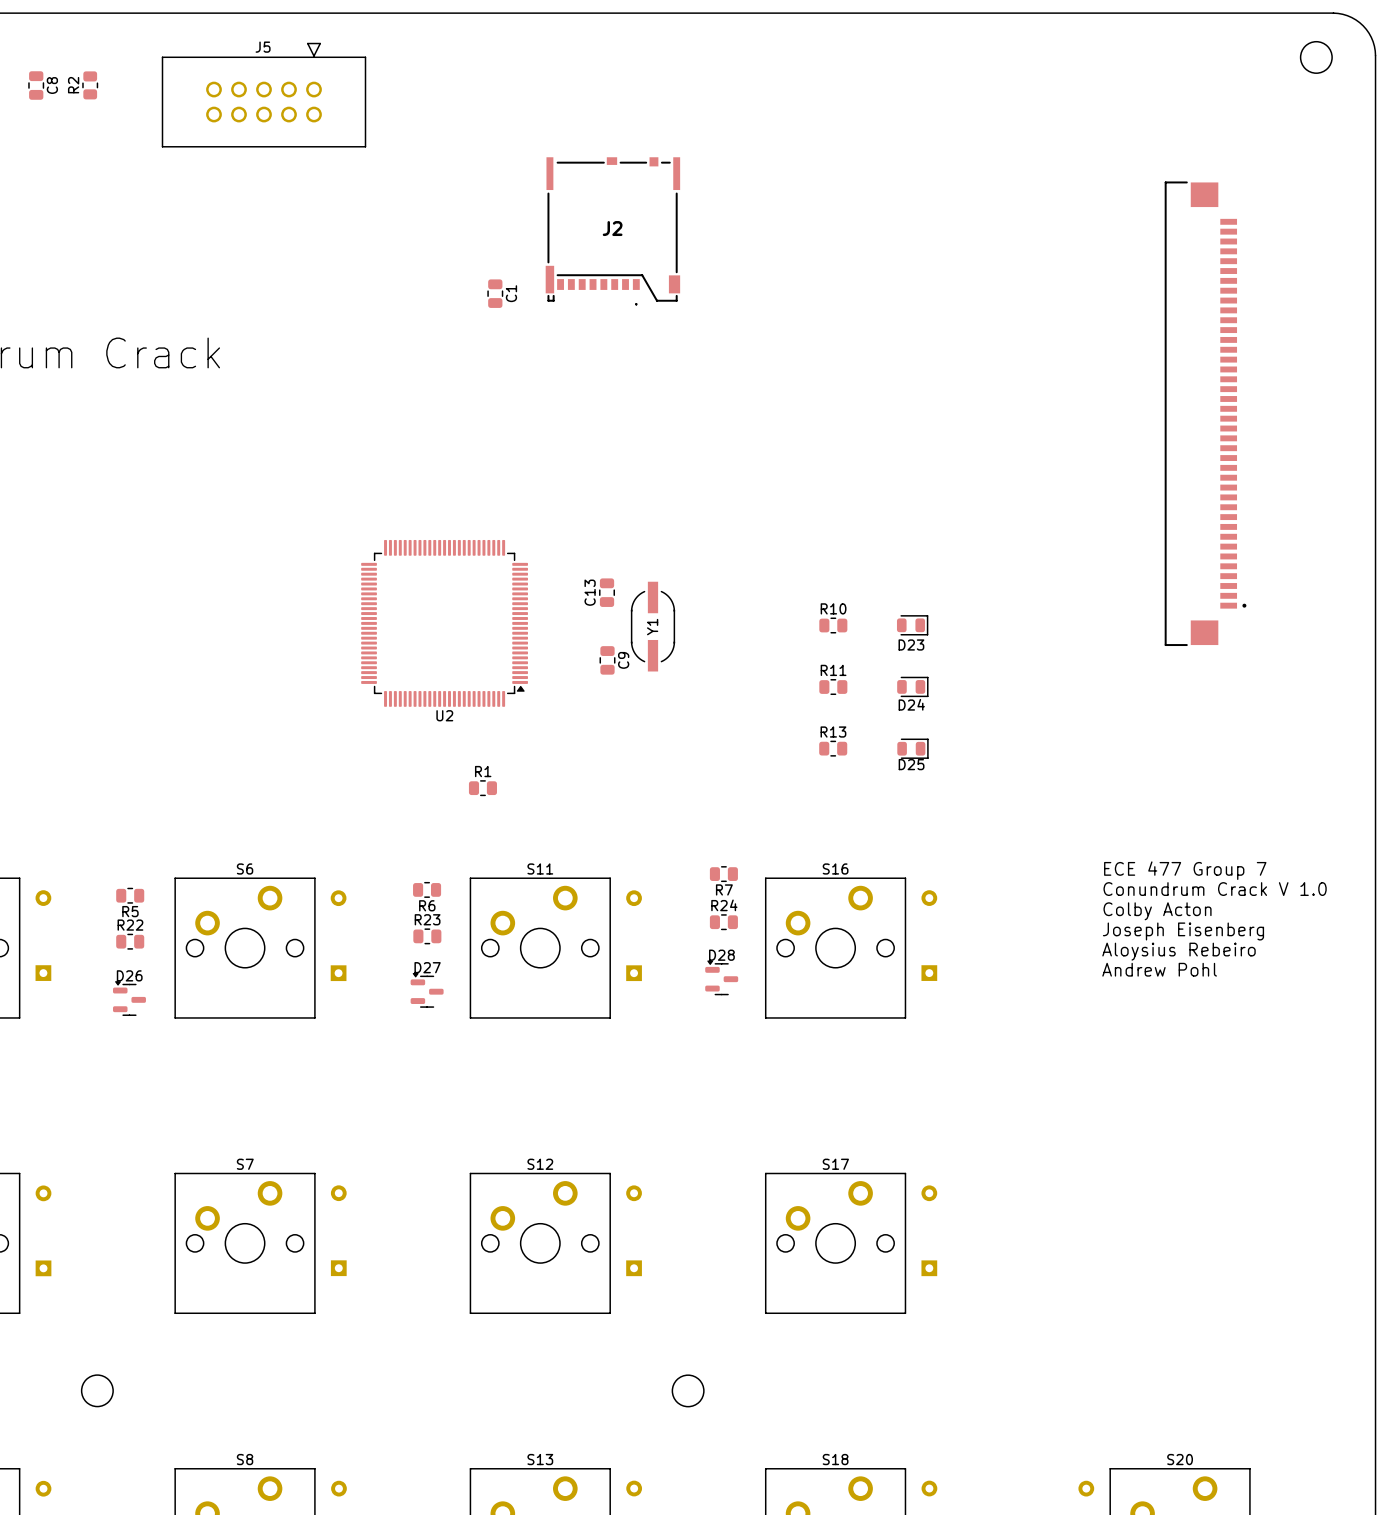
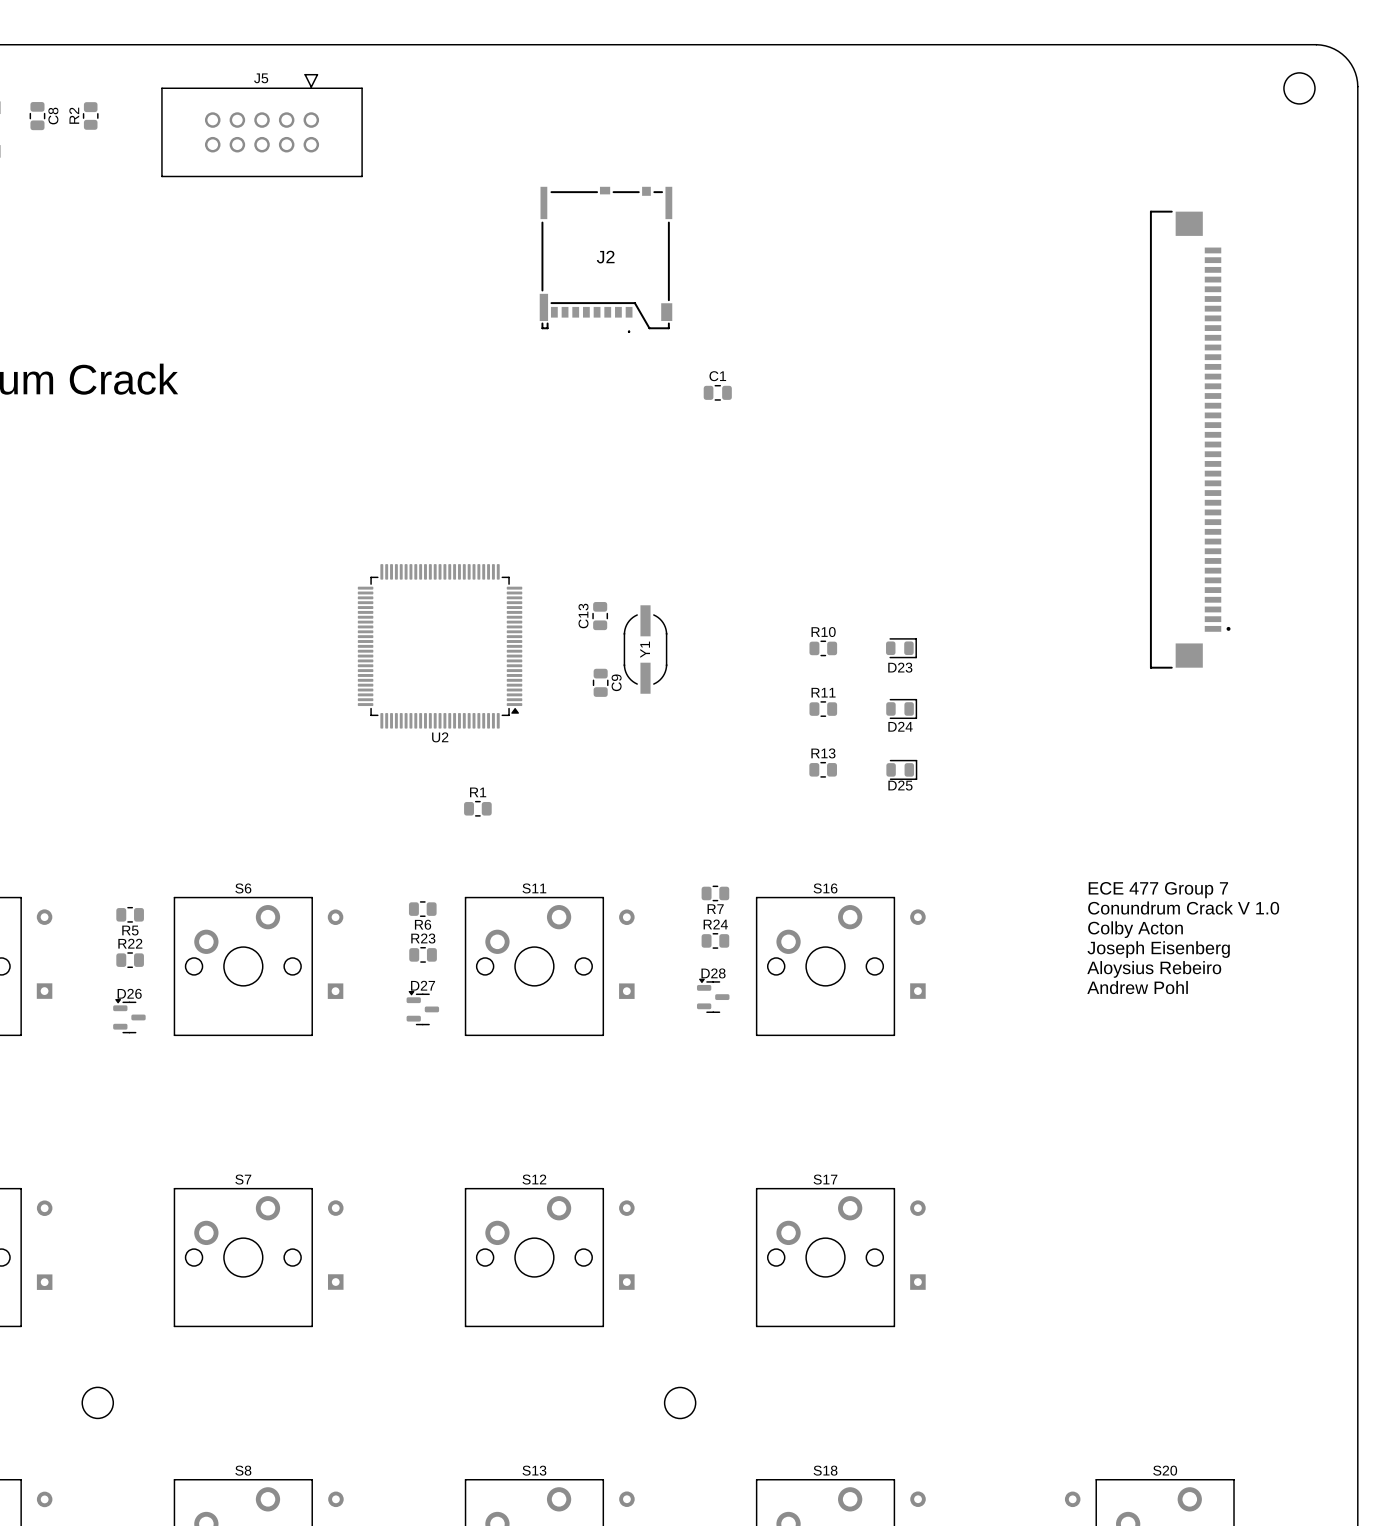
C1 rotation: 0° (495, 293) -> 90° clockwise (717, 392)
C1 position: (495, 293) -> (717, 392)
C1 name position: C1 (511, 293) -> C1 (717, 376)

